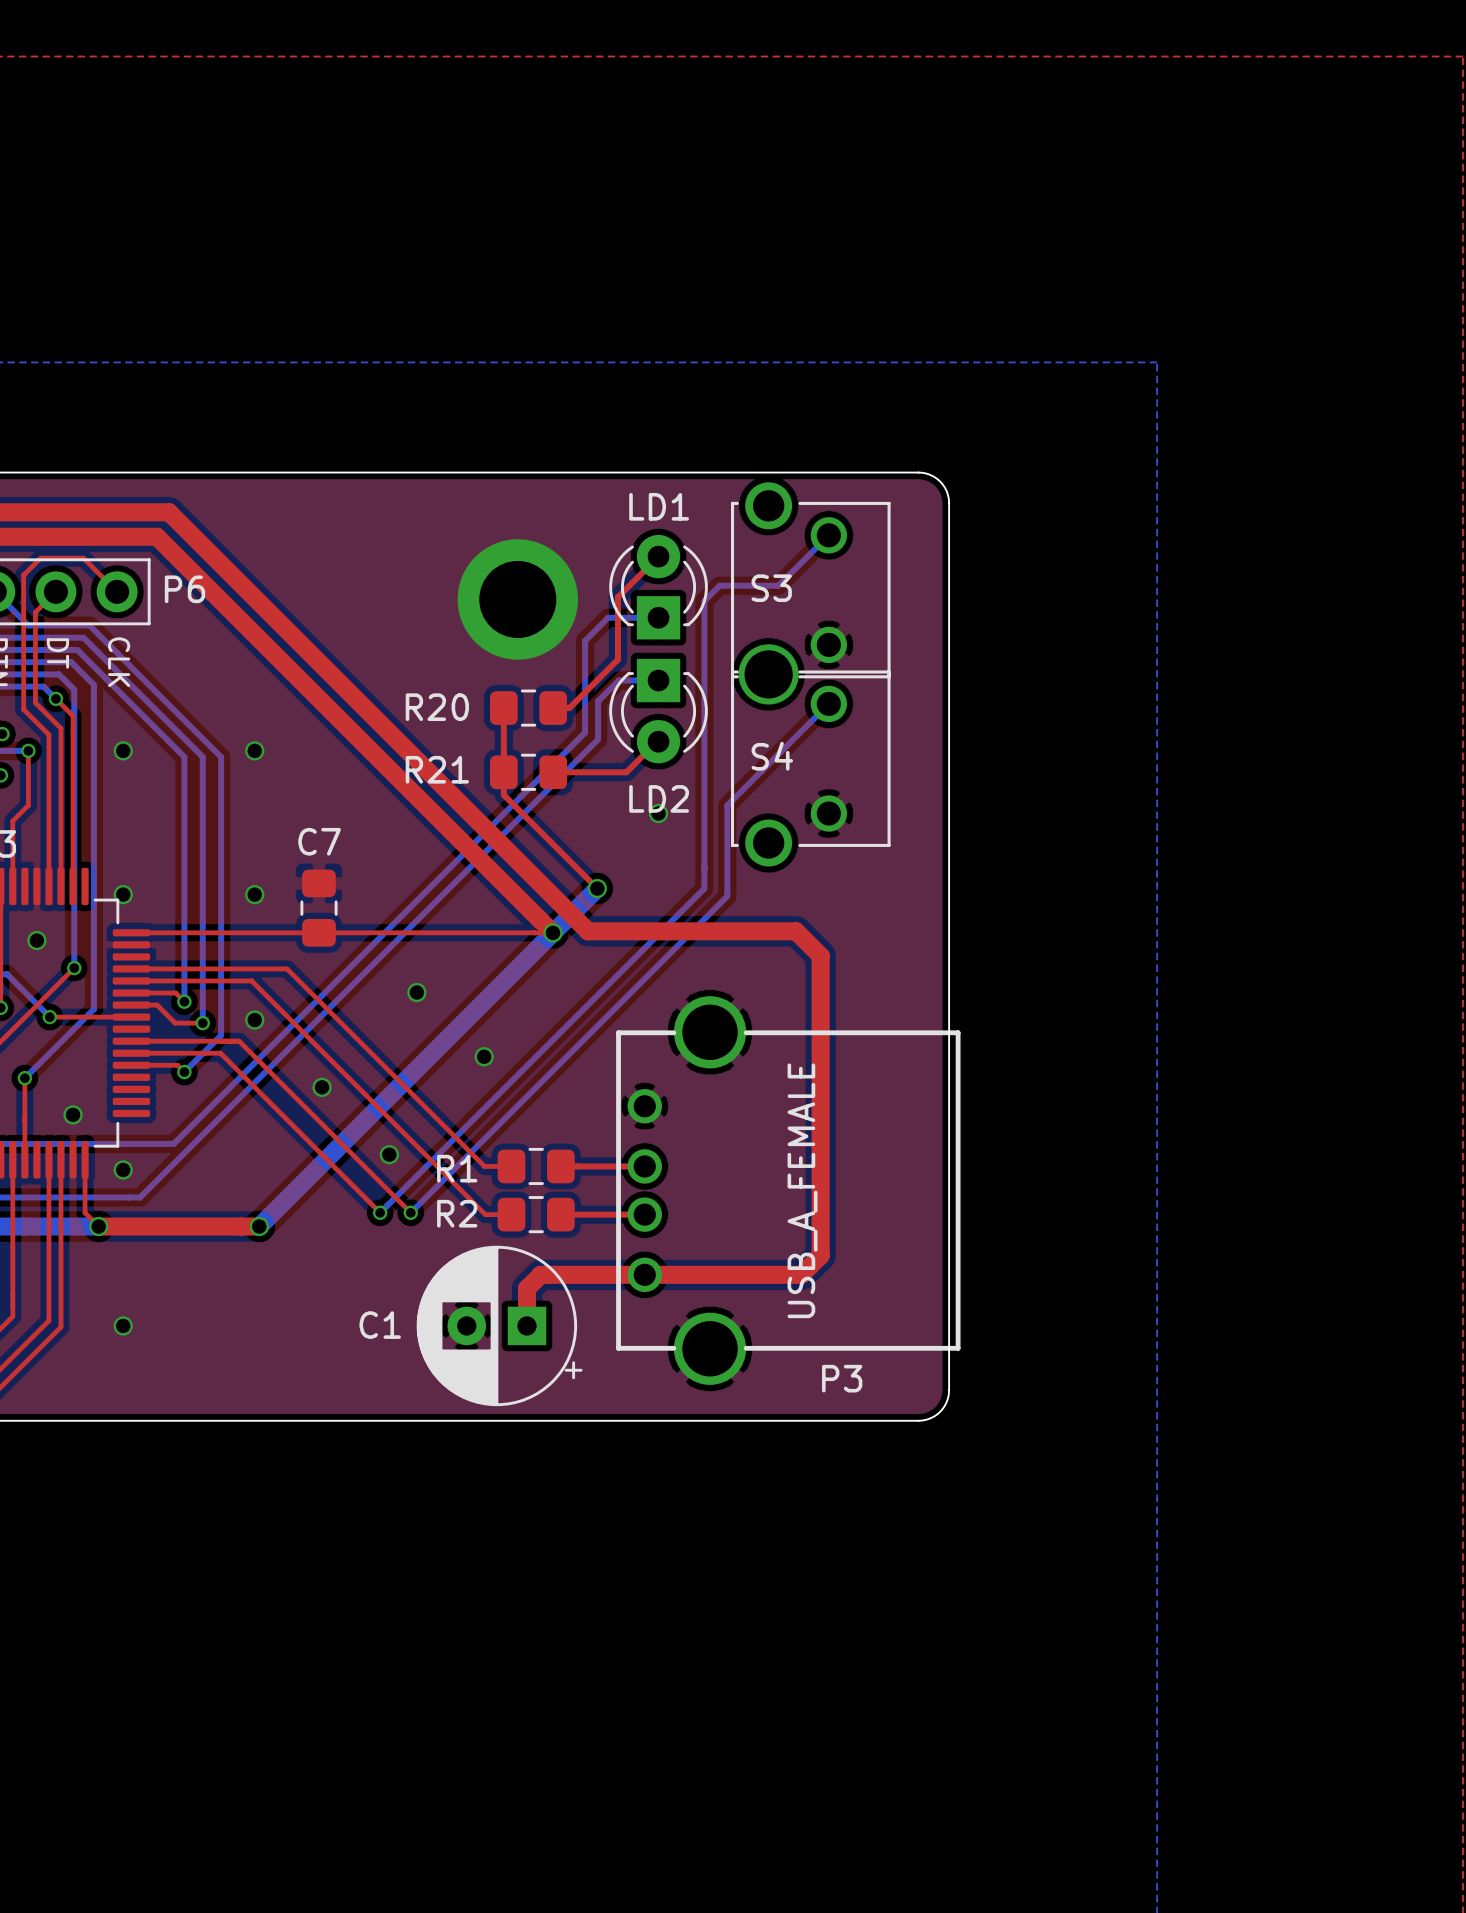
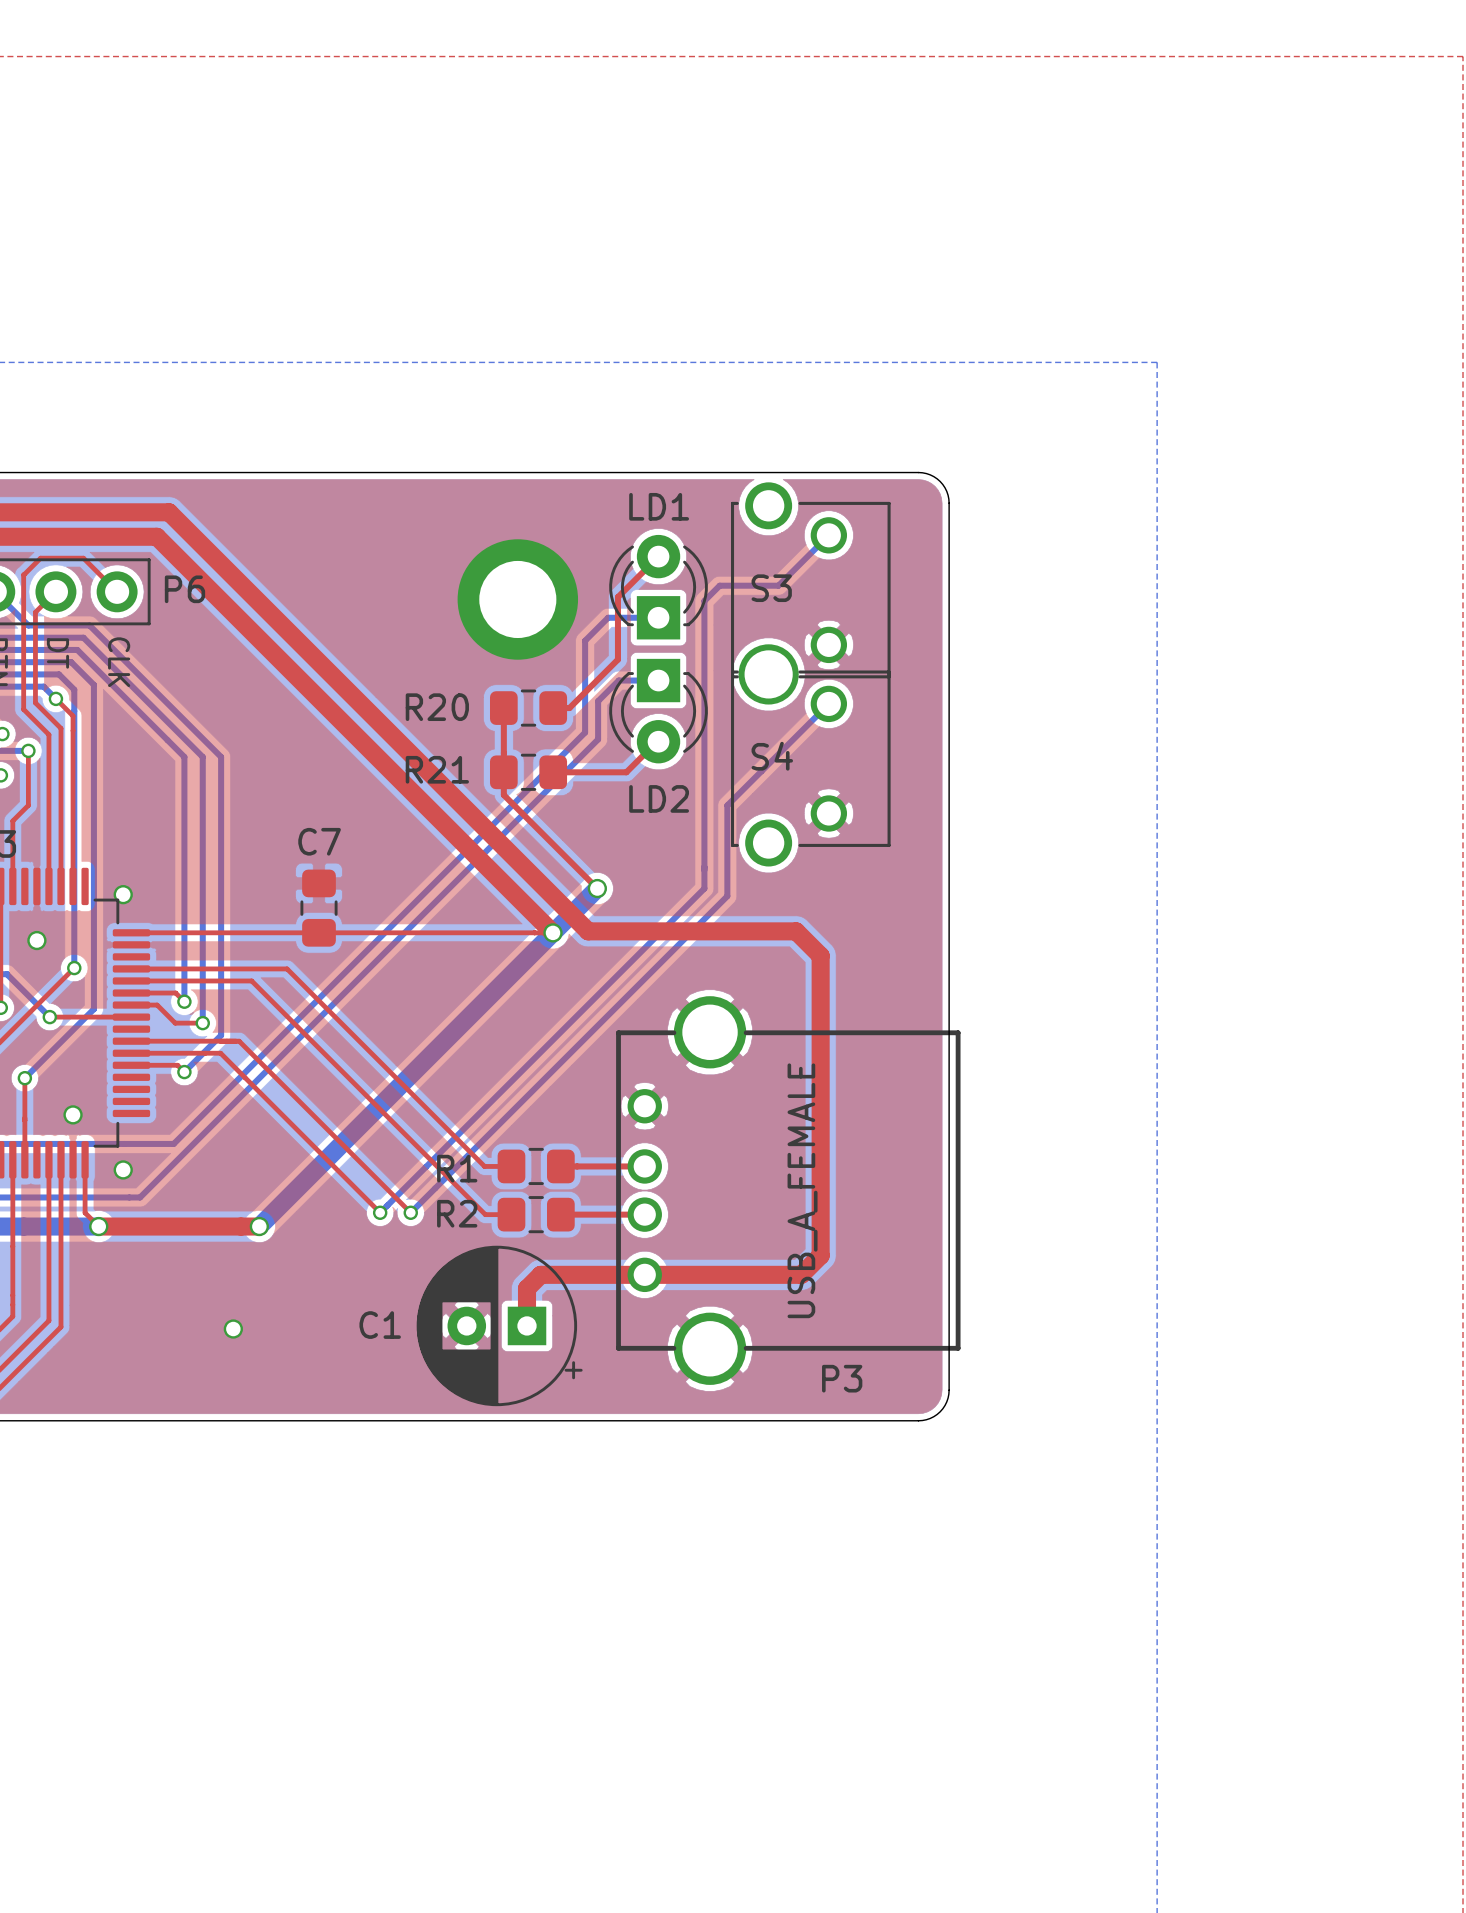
via: (123, 750) -> none
via: (254, 750) -> none
via: (658, 813) -> none
via: (254, 894) -> none
via: (416, 992) -> none
via: (254, 1020) -> none
via: (484, 1056) -> none
via: (322, 1087) -> none
via: (389, 1154) -> none
via position: (123, 1325) -> (233, 1329)

